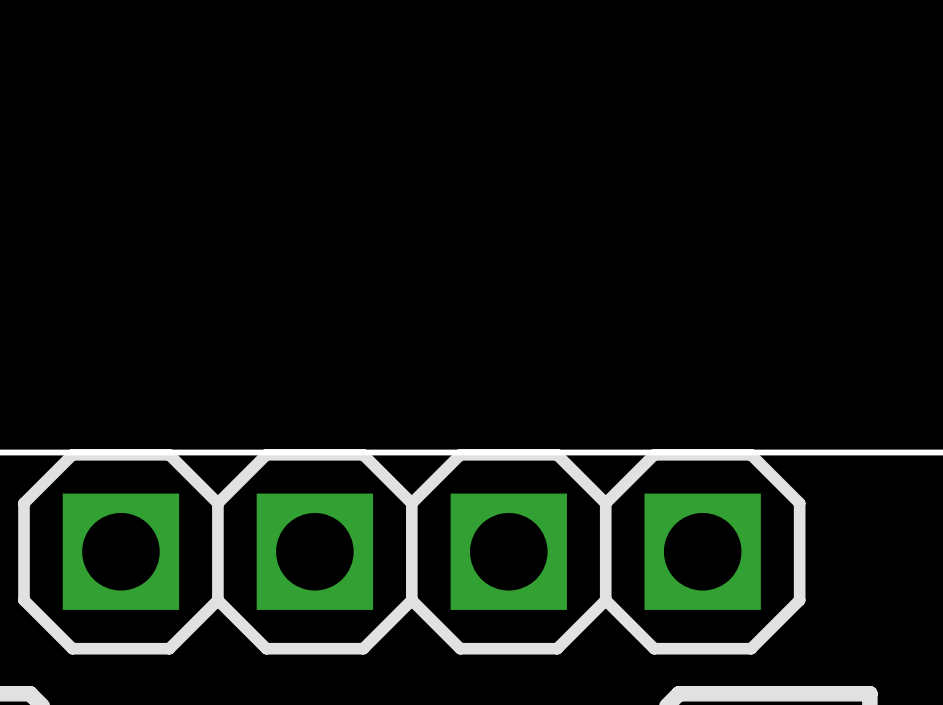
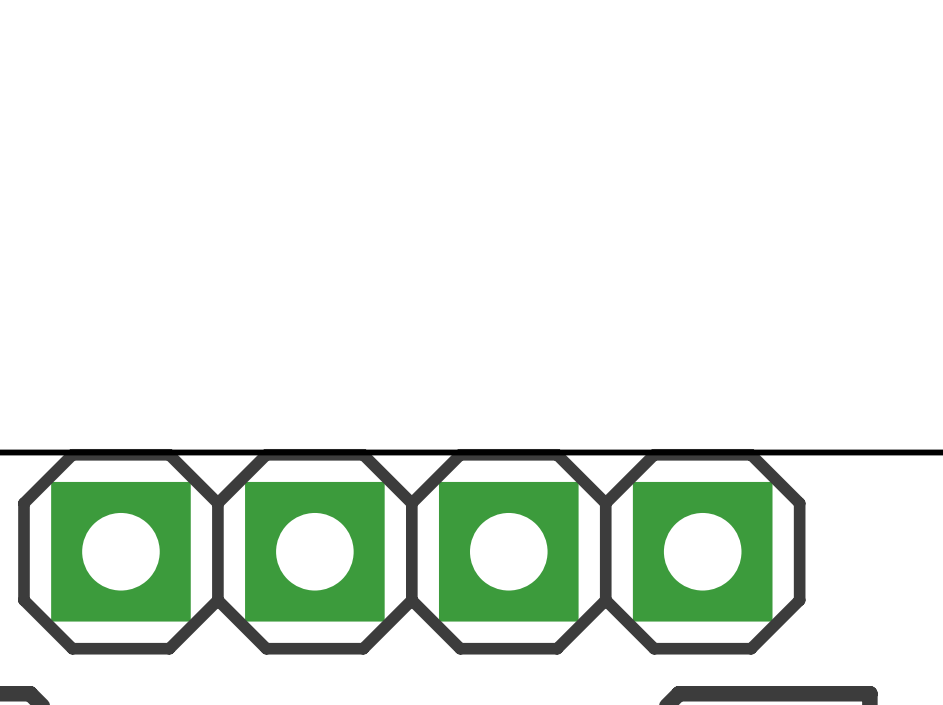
part footprint: [18, 448, 806, 655] -> [18, 448, 806, 655]

